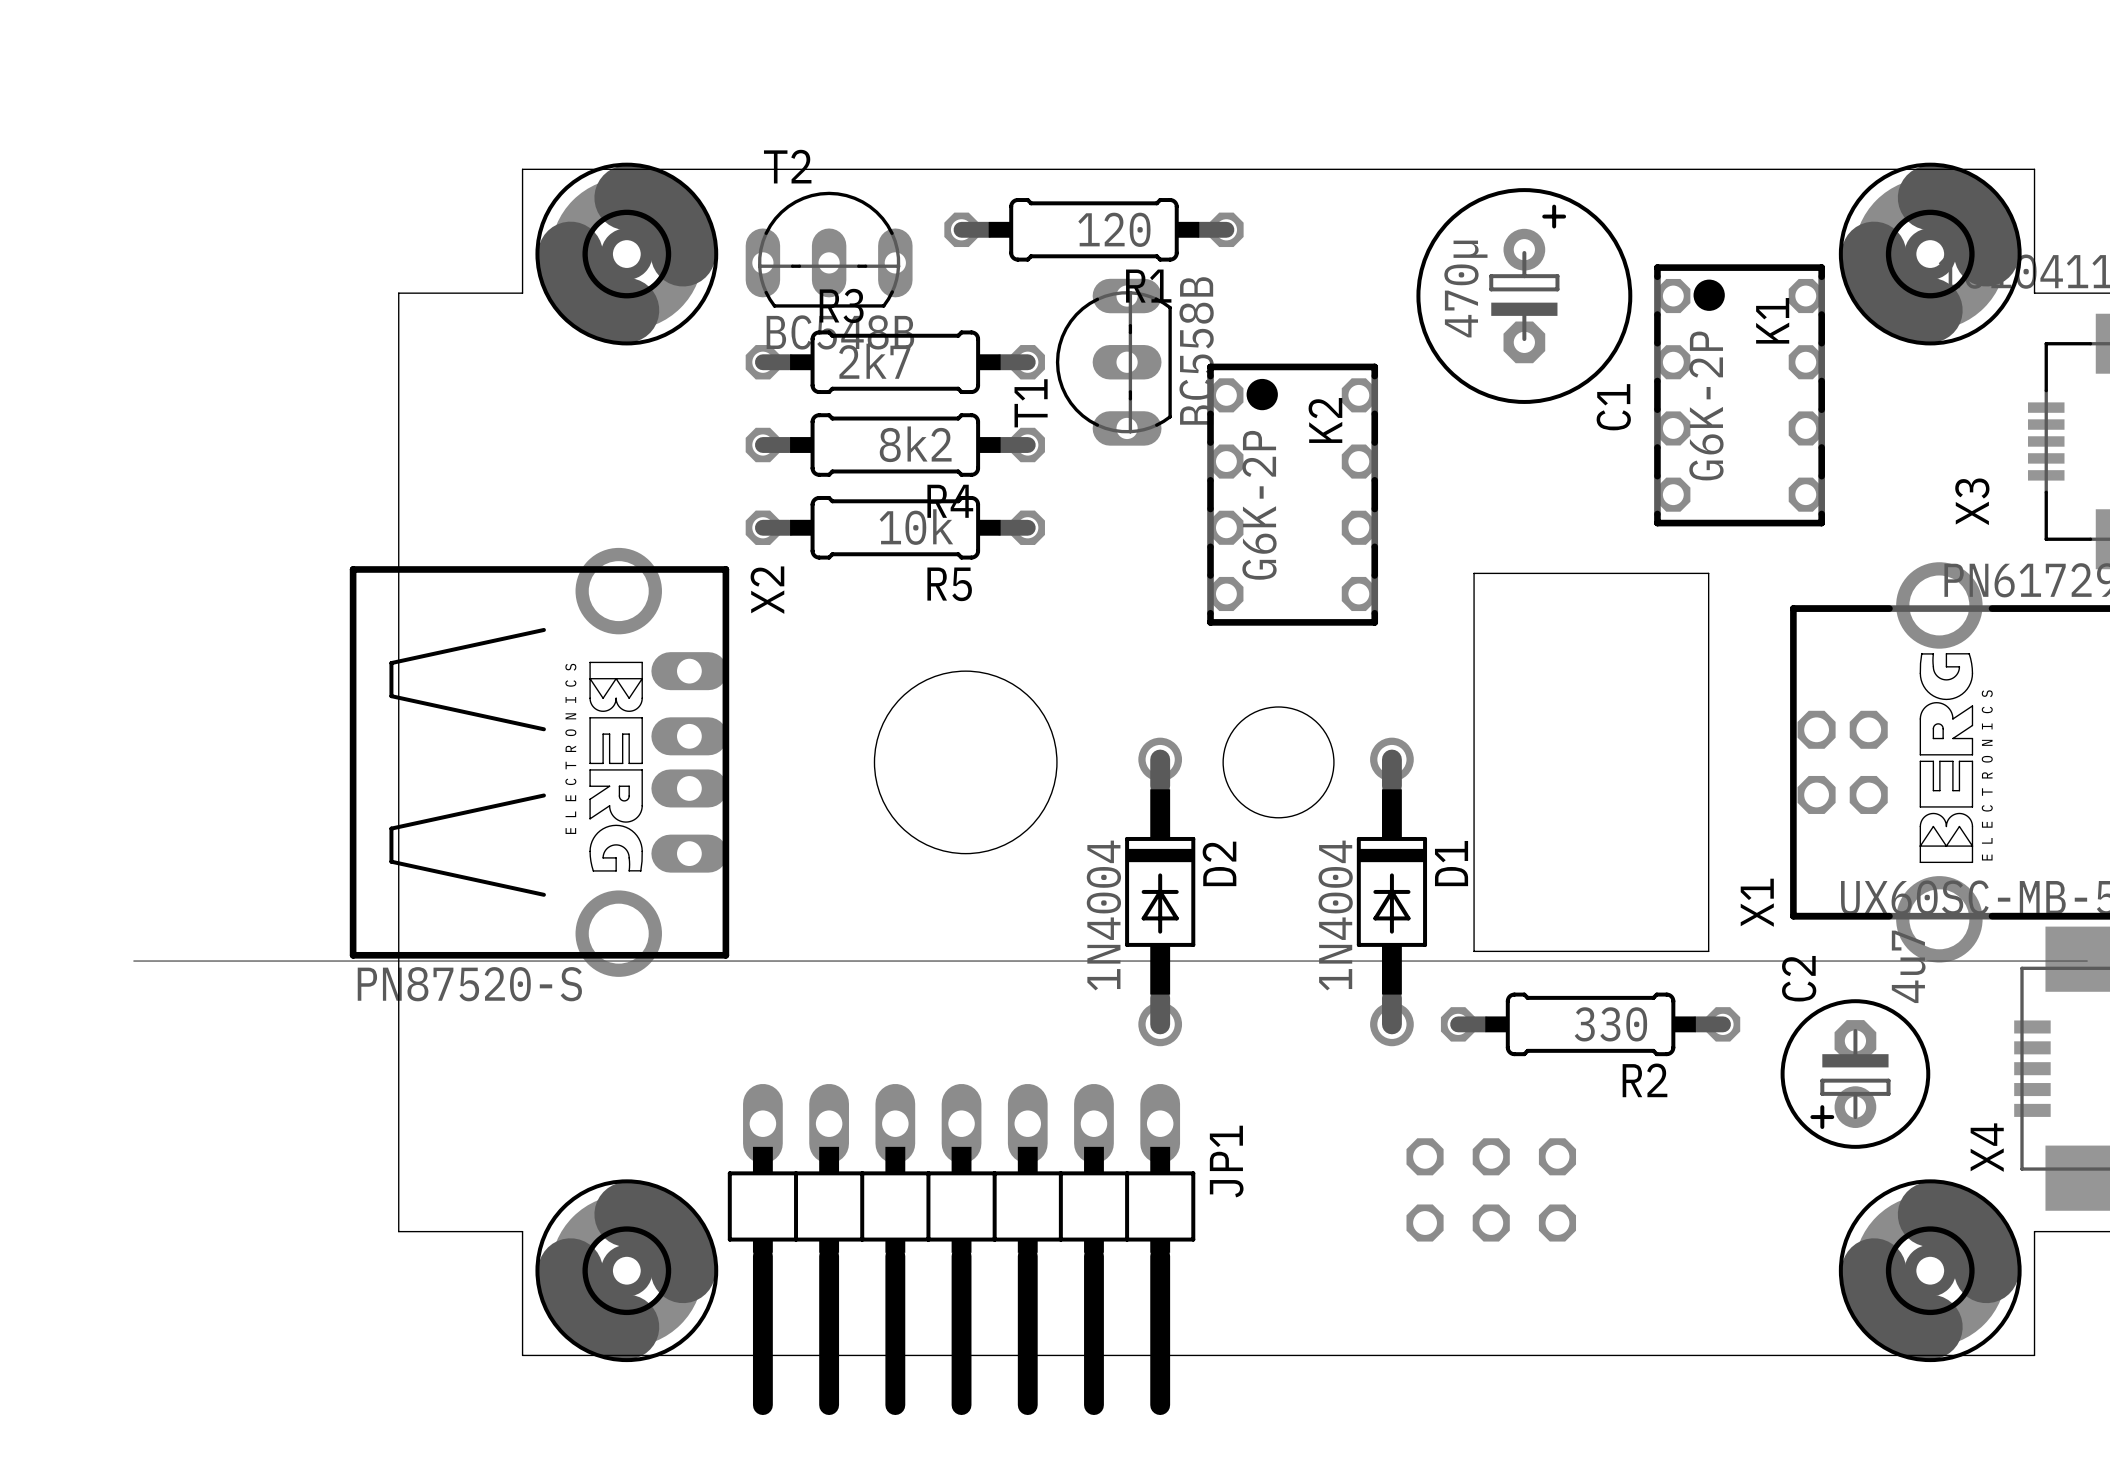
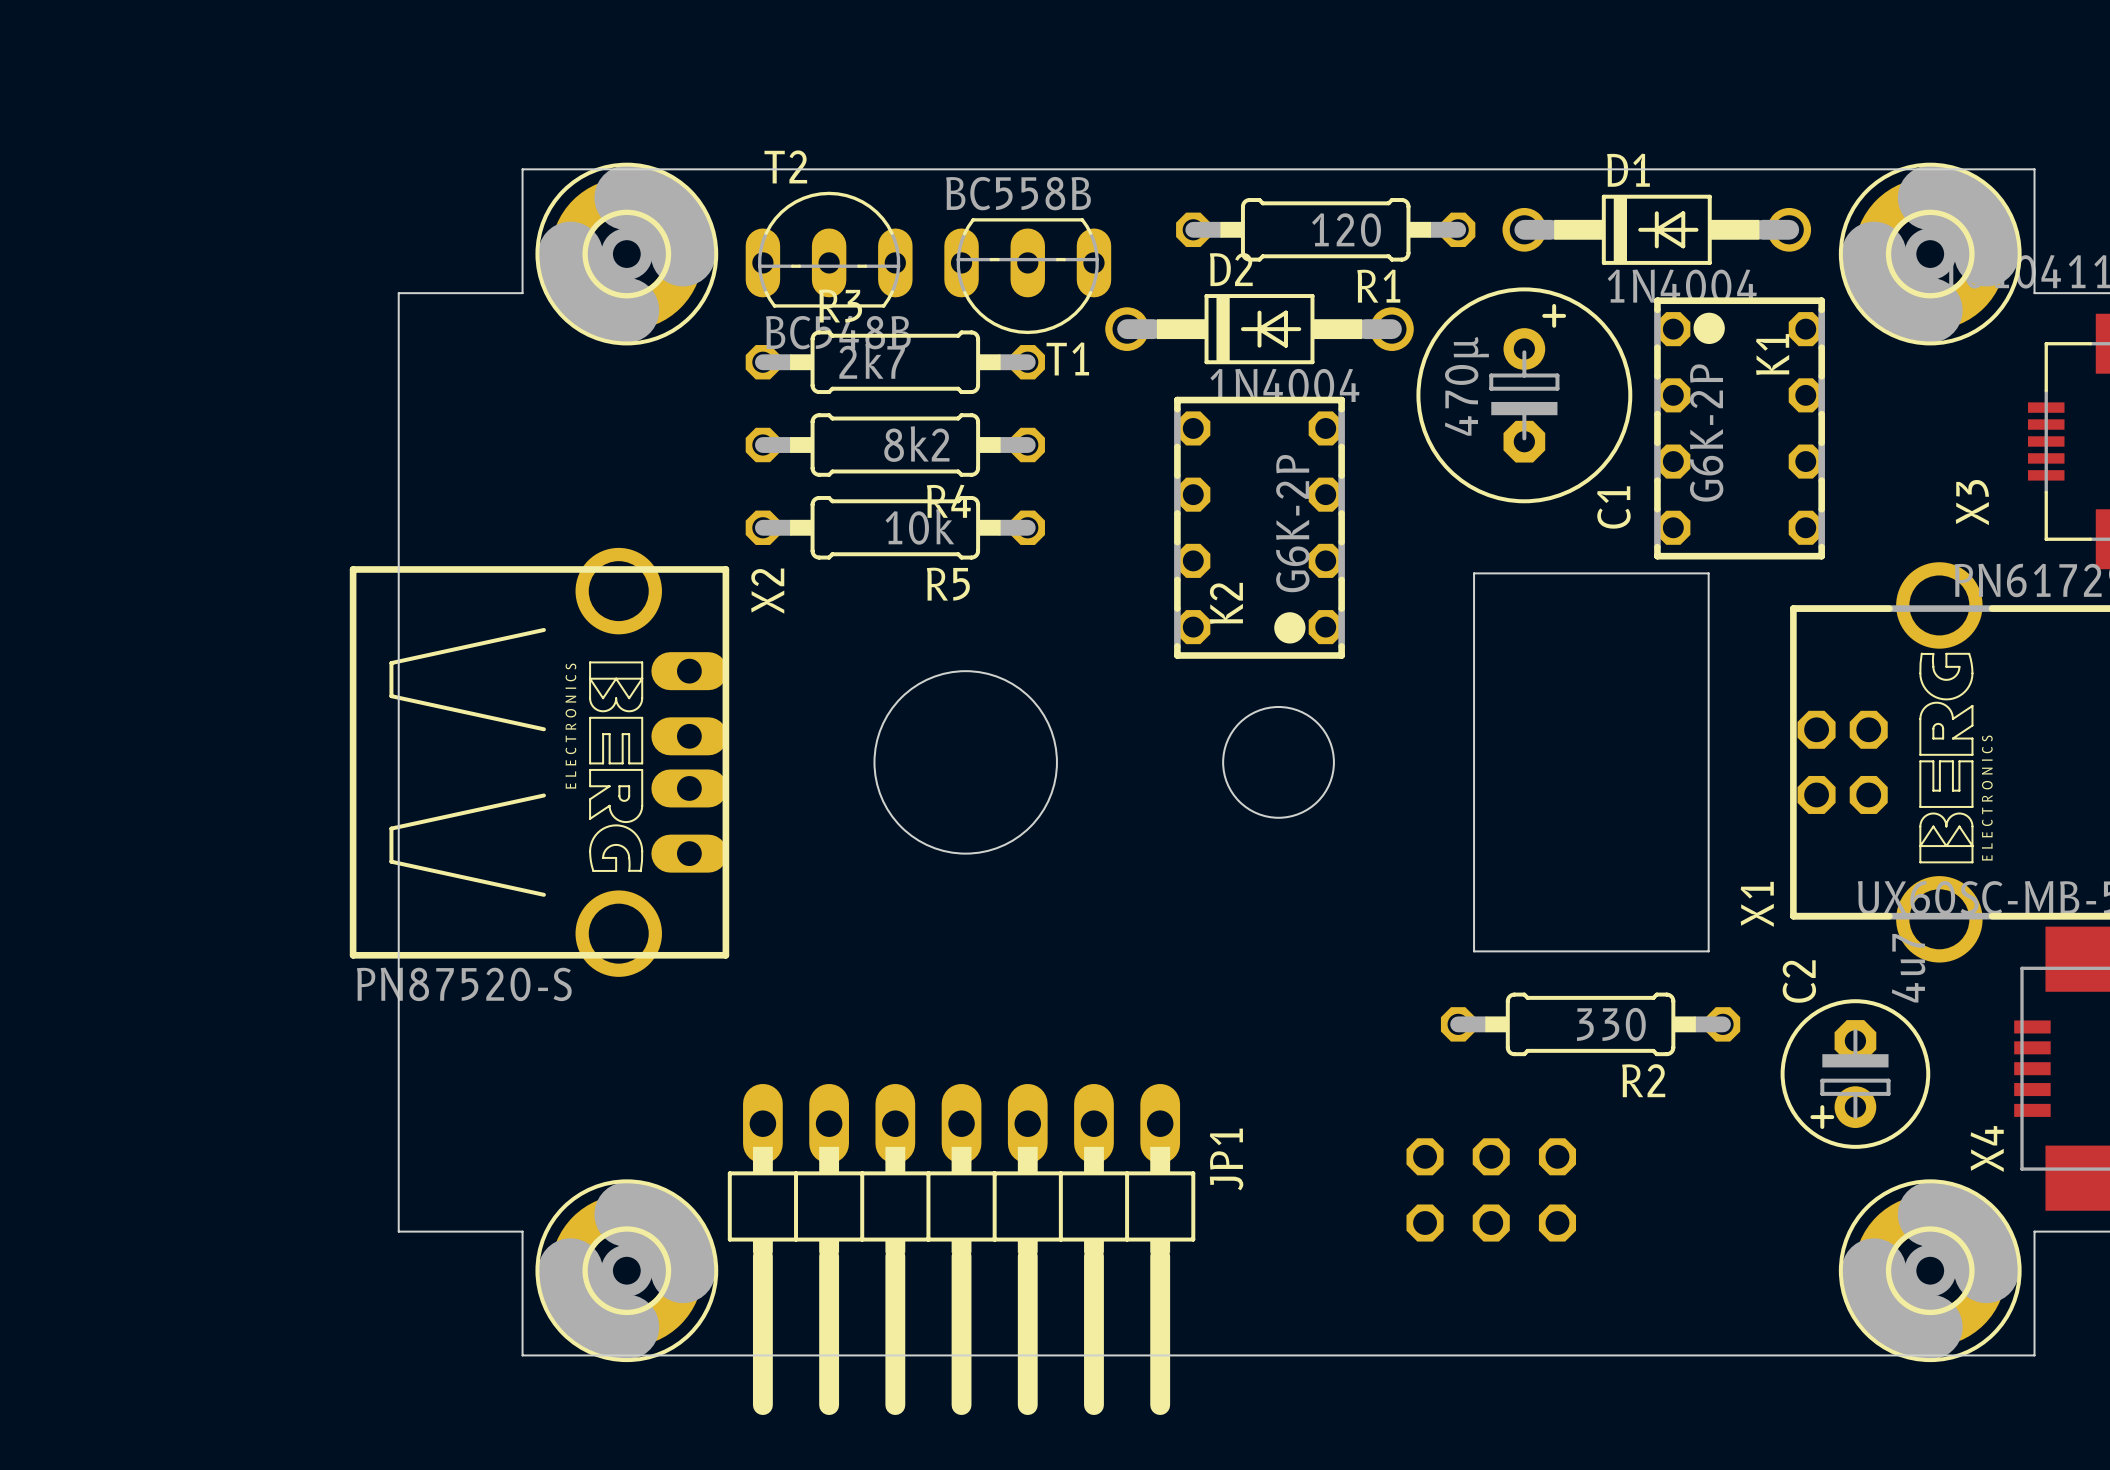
R1 position: (1093, 229) -> (1325, 229)
C1 position: (1524, 296) -> (1524, 395)
T1 rotation: 0° (1113, 362) -> 90° counterclockwise (1027, 276)
T1 position: (1113, 362) -> (1027, 276)
K1 position: (1739, 395) -> (1739, 428)
K2 rotation: 0° (1292, 494) -> 180° (1259, 527)
D2 rotation: 0° (1160, 891) -> 90° counterclockwise (1259, 329)
D2 position: (1160, 891) -> (1259, 329)
D1 rotation: 0° (1391, 891) -> 90° counterclockwise (1656, 229)
D1 position: (1391, 891) -> (1656, 229)
line: (133, 961) (2087, 961) -> none

